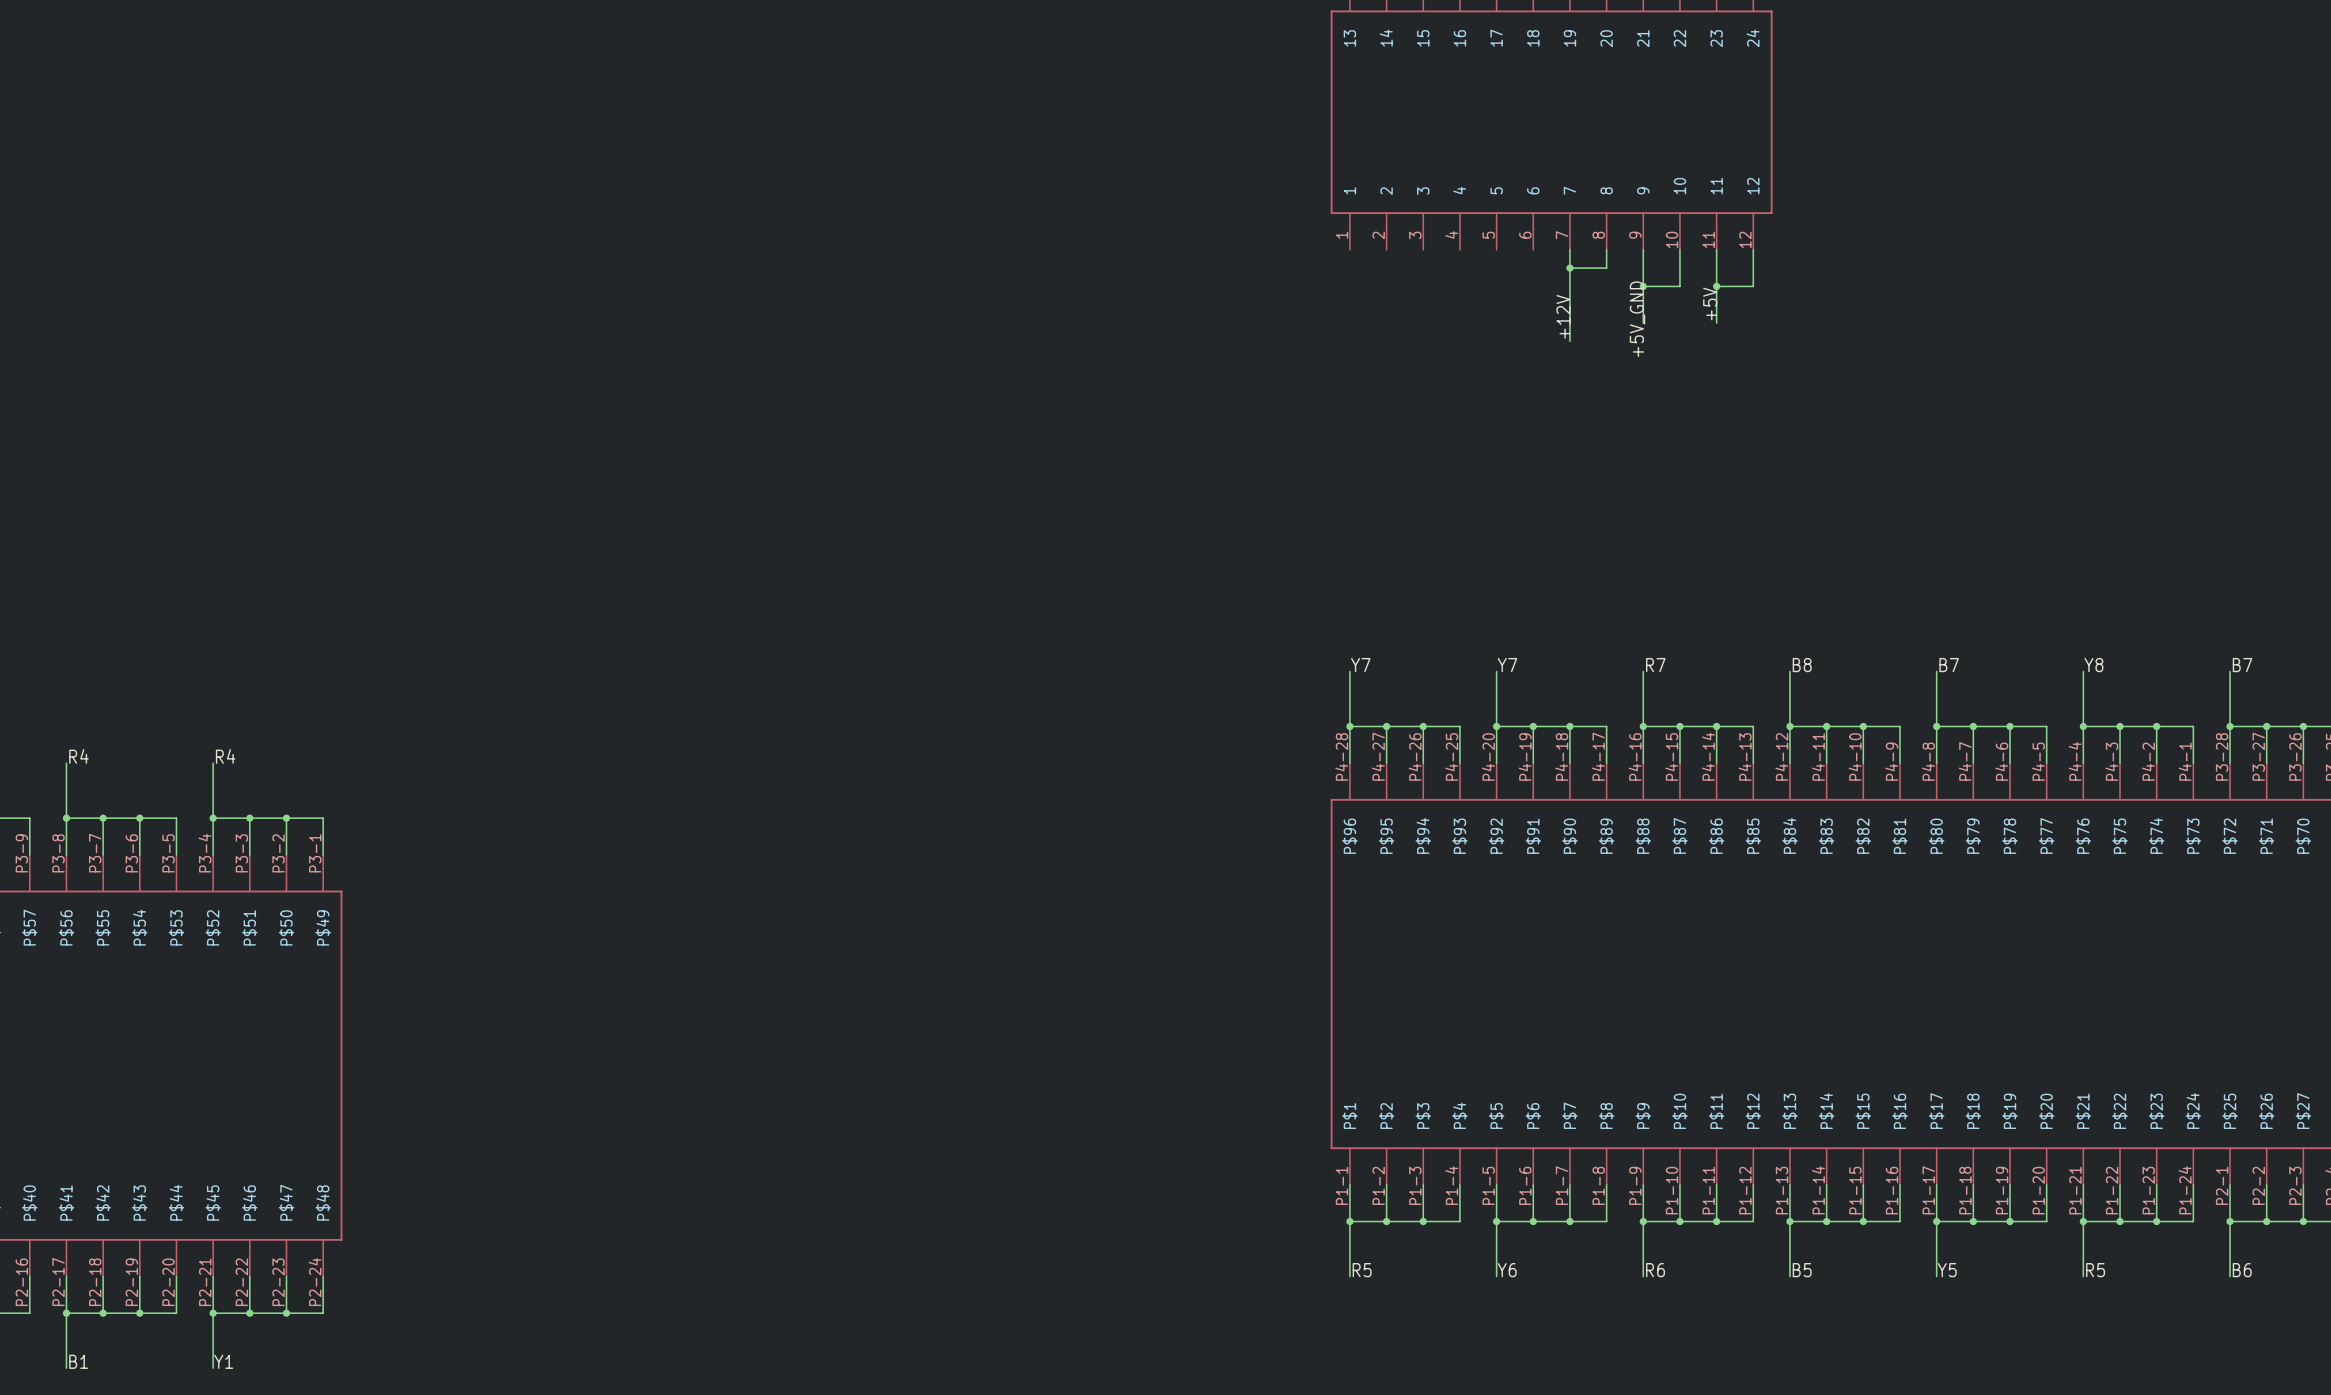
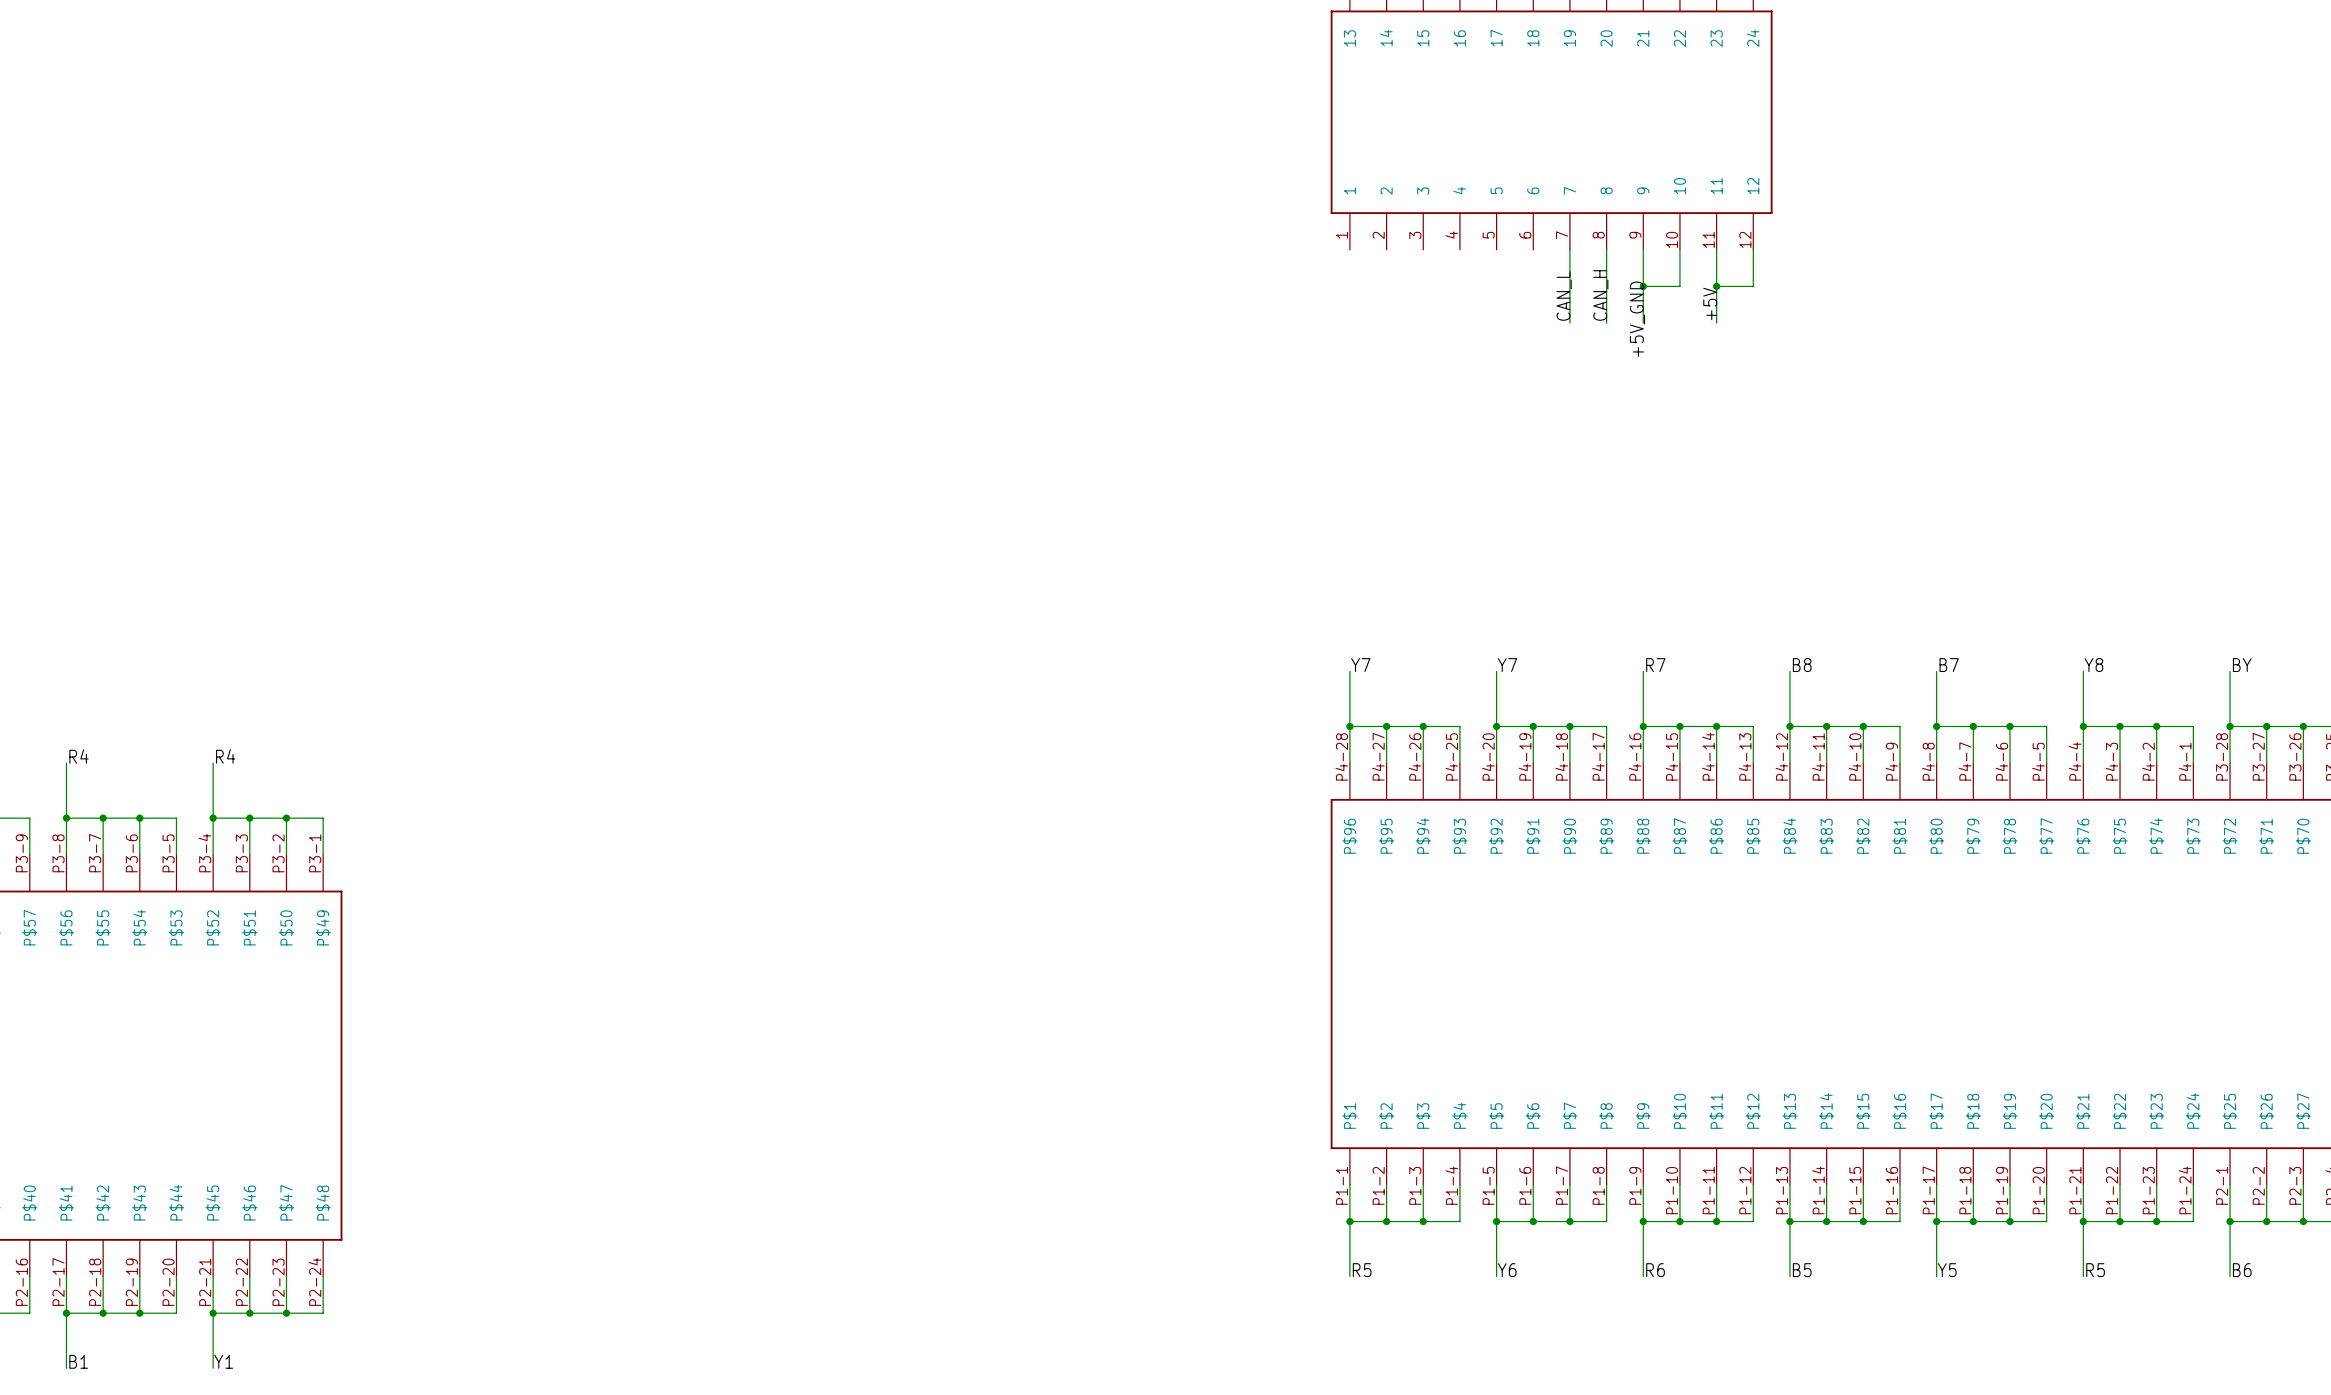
wire: (1569, 268) (1606, 268) -> (1606, 323) (1606, 268)
junction: (1569, 268) -> none
label: none -> CAN_H (1600, 295)
label: none -> CAN_L (1564, 296)
label: +12V (1563, 316) -> none
wire: (1569, 323) (1569, 341) -> none
label: B7 (2242, 665) -> BY (2242, 665)

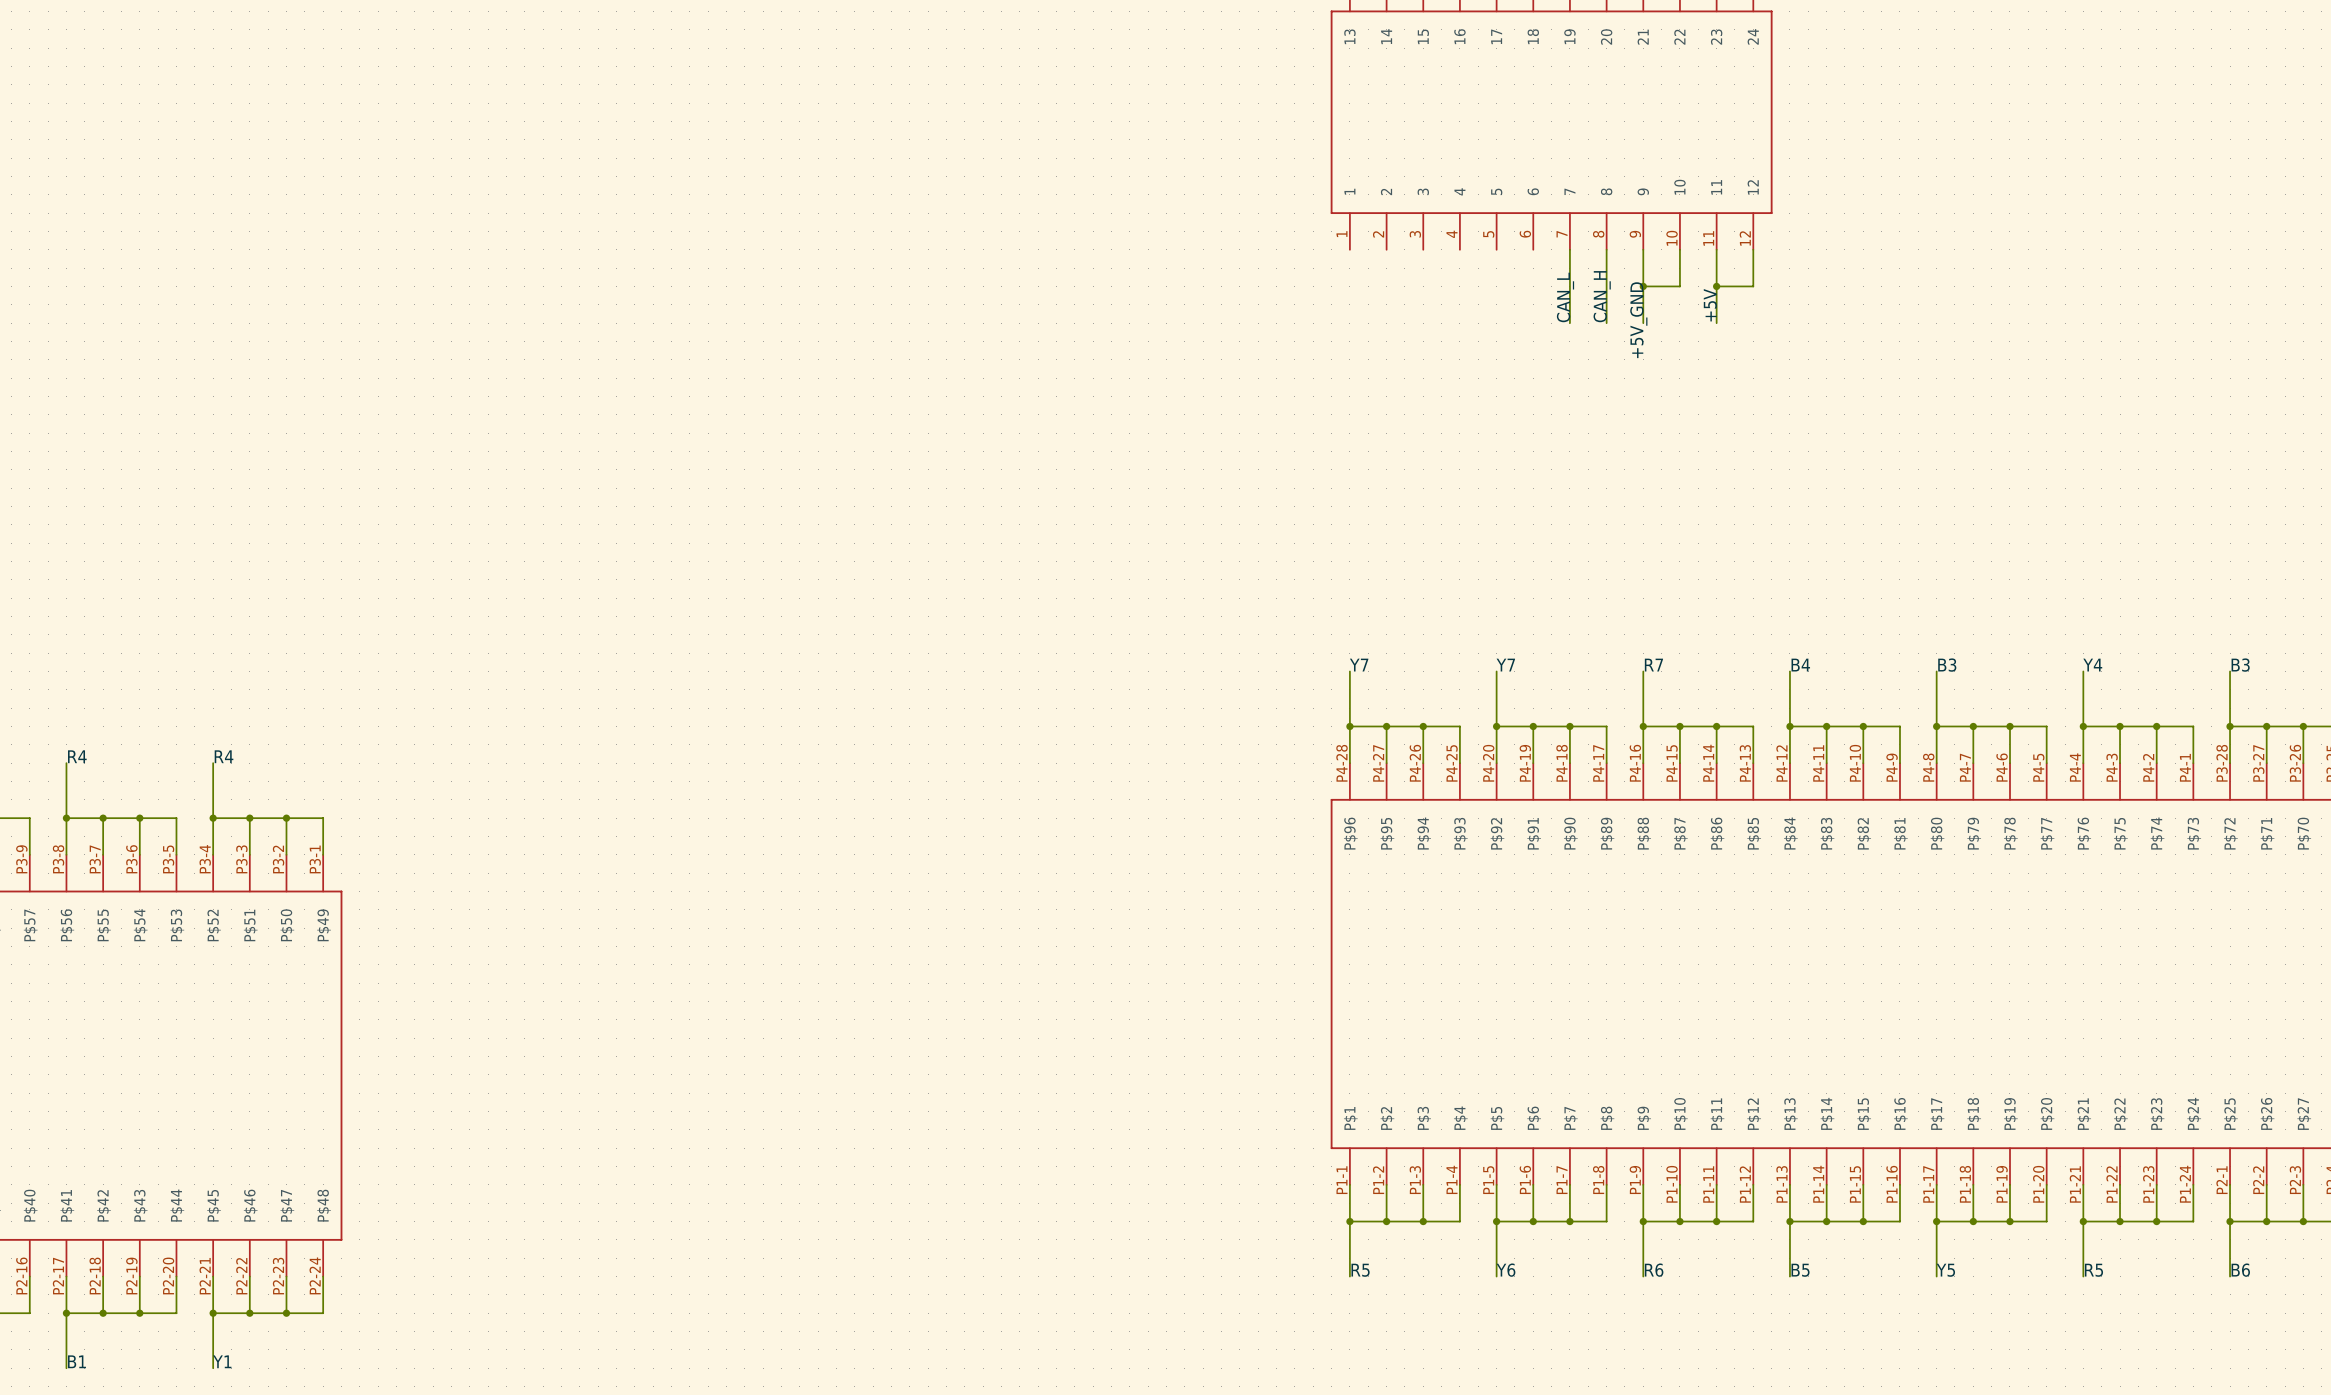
label: B8 (1802, 665) -> B4 (1800, 665)
label: B7 (1949, 665) -> B3 (1947, 665)
label: Y8 (2093, 665) -> Y4 (2092, 665)
label: BY (2242, 665) -> B3 (2240, 665)

